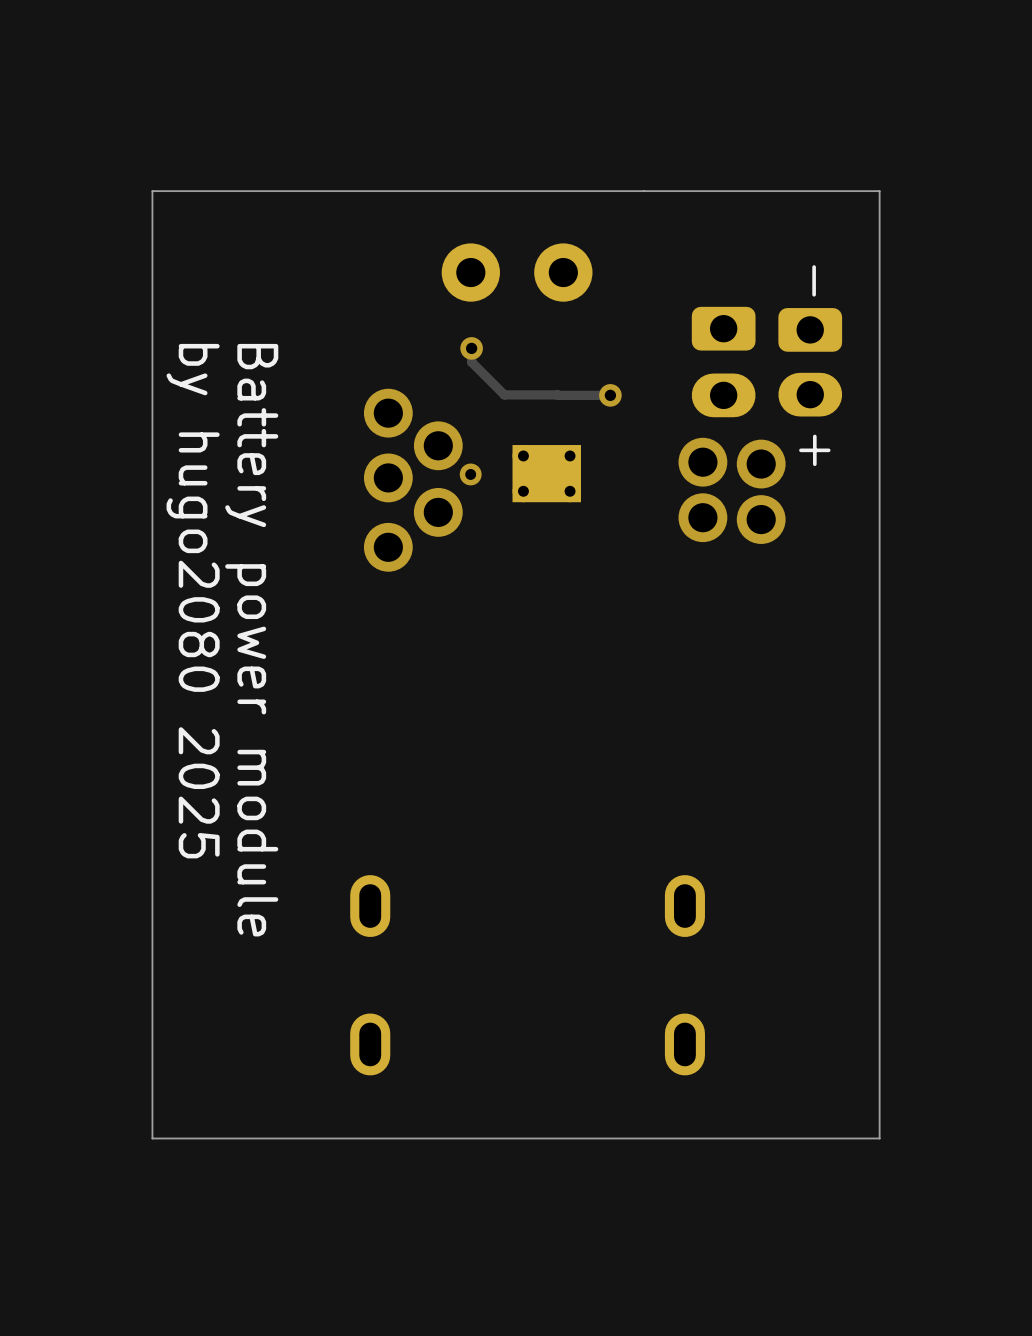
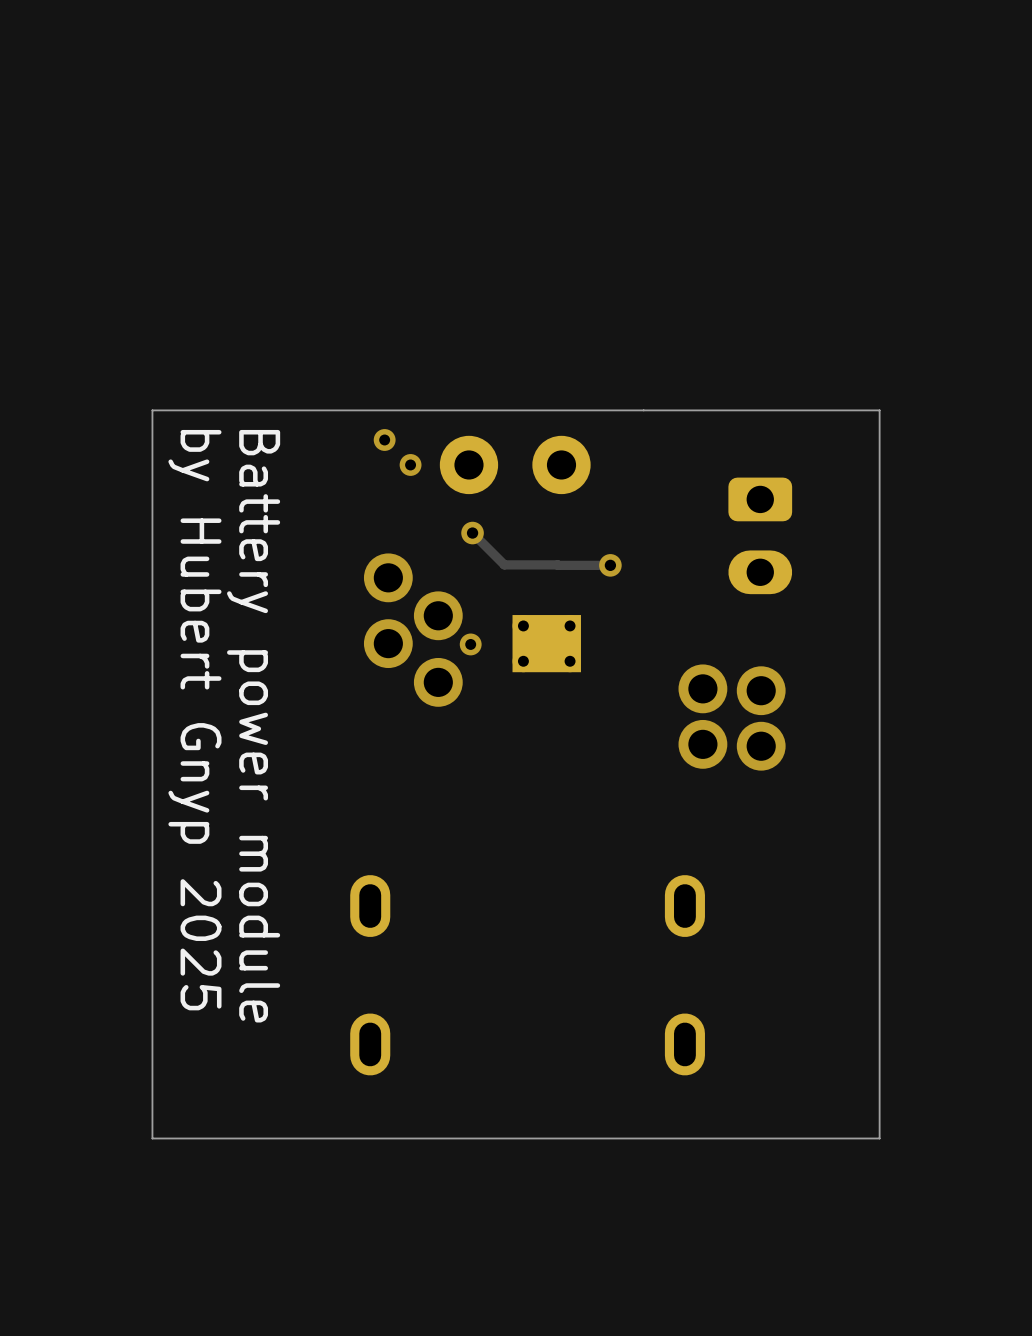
part: (517, 272) -> none
text: - (814, 280) -> none
part: (810, 329) -> none
track: (471, 348) (471, 362) (504, 394) (557, 394) -> none
via: (471, 348) -> none
part: (723, 362) -> none
via size: [363, 388, 413, 438] -> [373, 429, 396, 451]
part: (810, 394) -> none
track: (610, 395) (558, 395) -> (610, 565) (558, 565)
via: (610, 395) -> none
board edge: (879, 410) (879, 191) (152, 191) (152, 410) -> (879, 410) (152, 410)
via: (438, 445) -> none
part footprint: [512, 445, 581, 503] -> [439, 435, 591, 495]
text: + (814, 450) -> none
via: (702, 462) -> none
via: none -> (410, 464)
via: (761, 464) -> none
via: (470, 474) -> none
via: (388, 477) -> none
via: (438, 512) -> none
via: (702, 517) -> none
via: (761, 519) -> none
track: none -> (472, 533) (504, 564) (557, 564)
via: none -> (472, 533)
part: none -> (760, 535)
via position: (388, 547) -> (388, 577)
via: none -> (610, 565)
text: by hugo2080 2025 (193, 601) -> none
via: none -> (438, 615)
text position: Battery power module (251, 640) -> Battery power module (253, 726)
via: none -> (388, 643)
part: none -> (546, 643)
via: none -> (470, 644)
via: none -> (438, 682)
via: none -> (702, 688)
via: none -> (761, 690)
text: none -> by Hubert Gnyp 2025 (194, 720)
via: none -> (702, 744)
via: none -> (761, 746)

